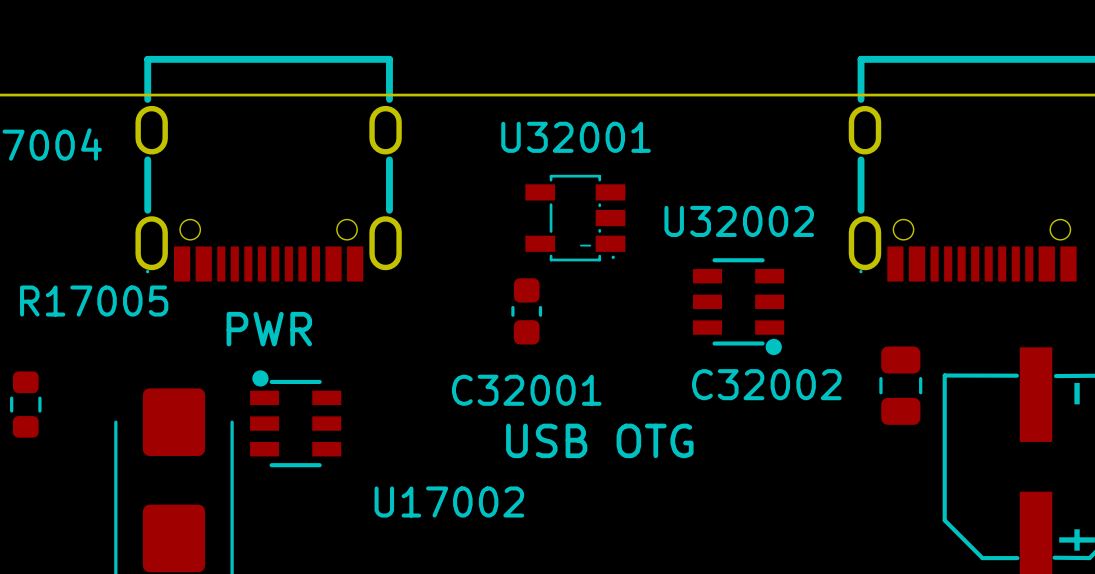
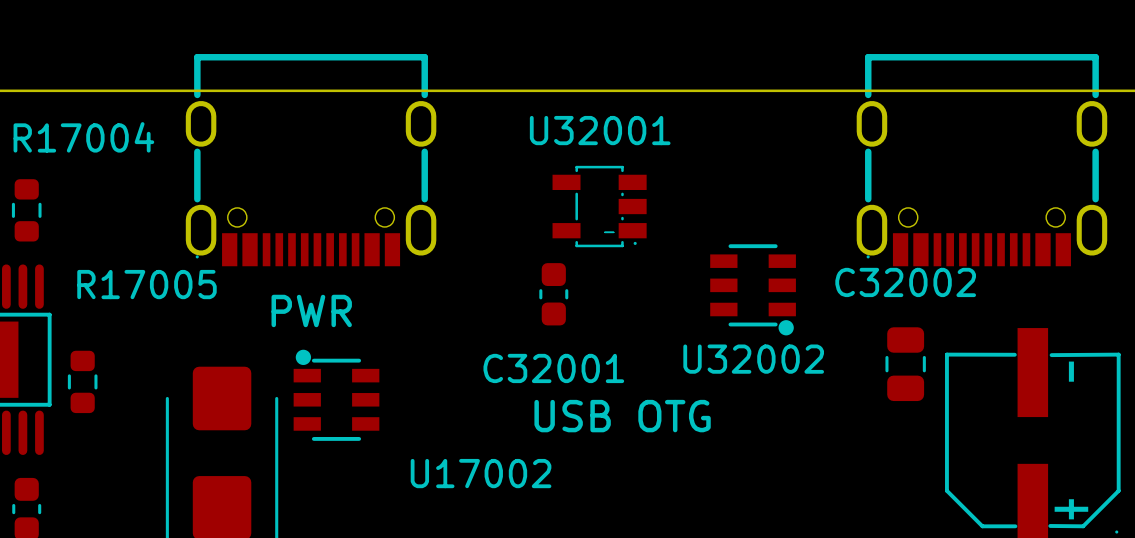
U32002 name position: U32002 (739, 221) -> U32002 (753, 359)
C32002 name position: C32002 (766, 384) -> C32002 (905, 282)

